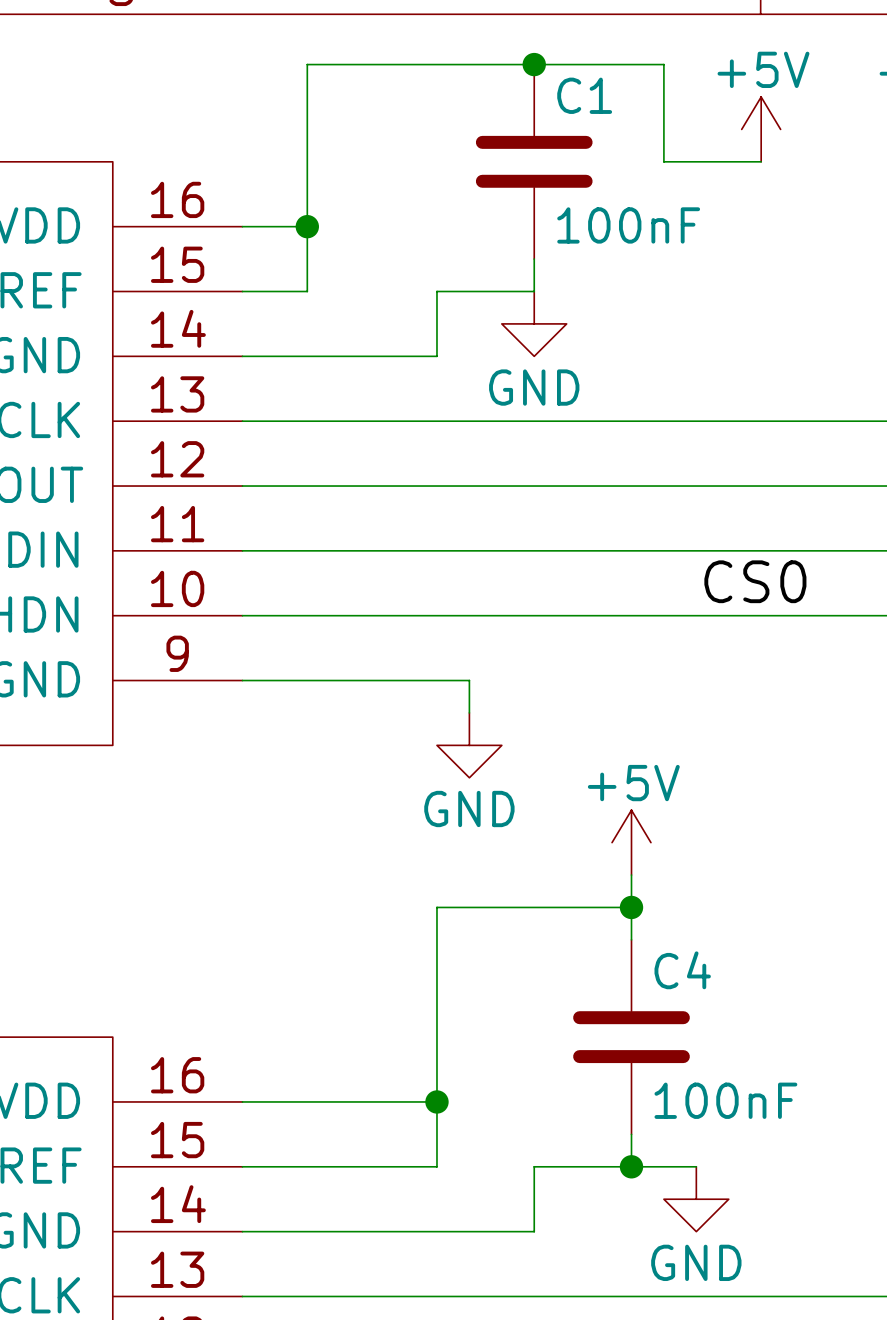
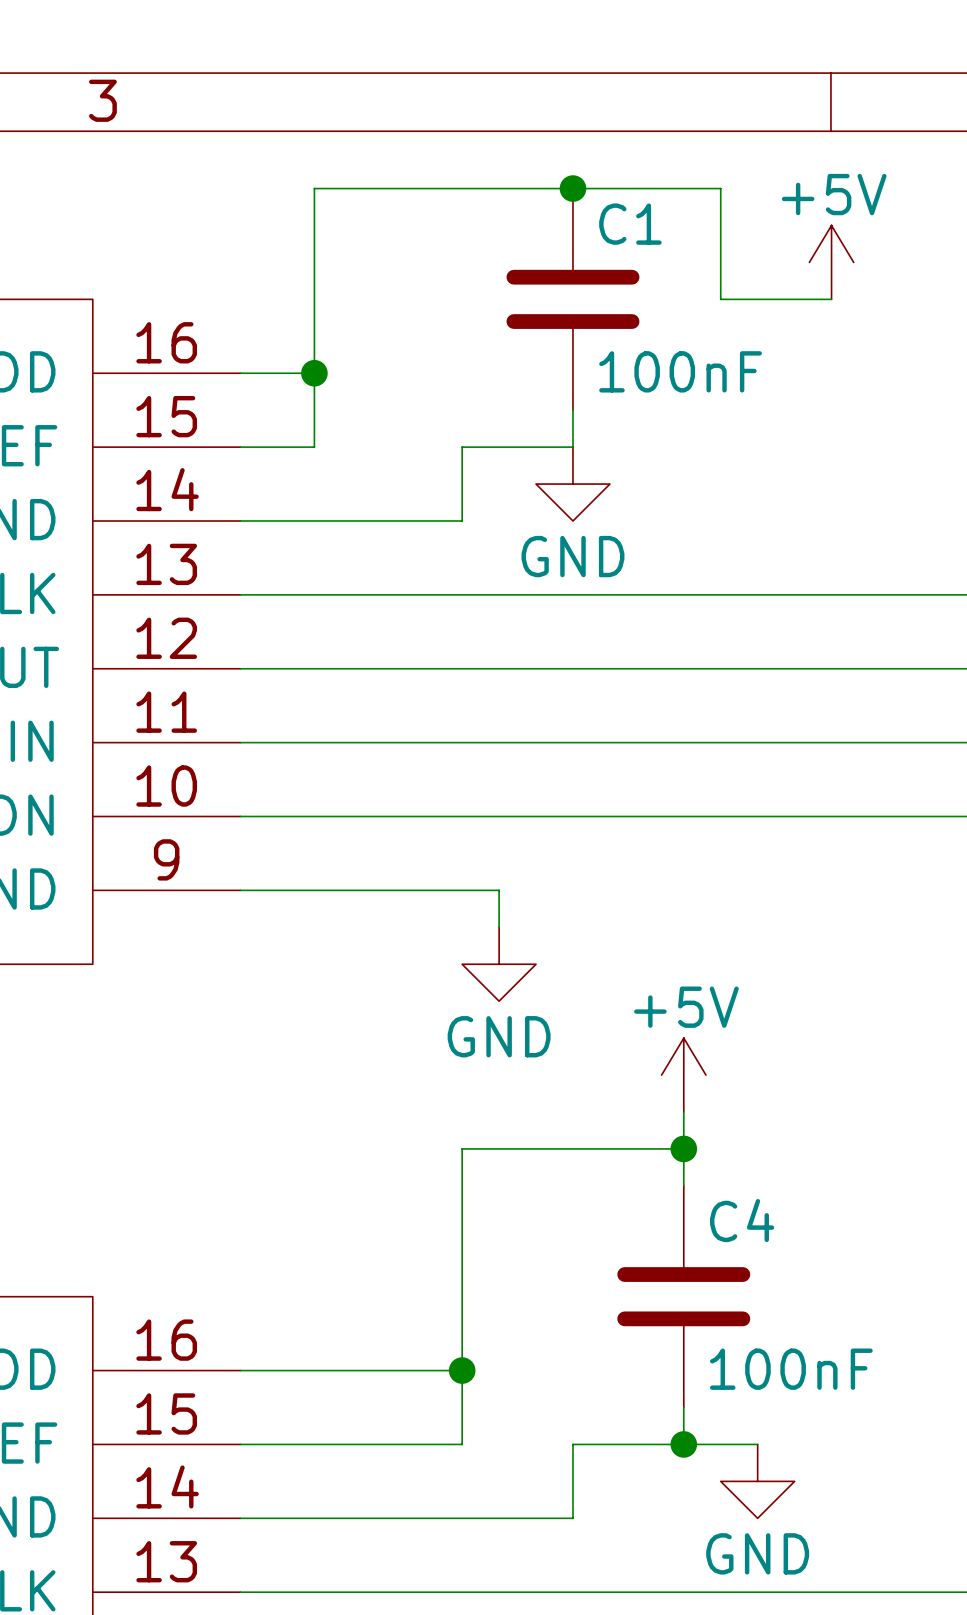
label: CS0 (755, 581) -> none

